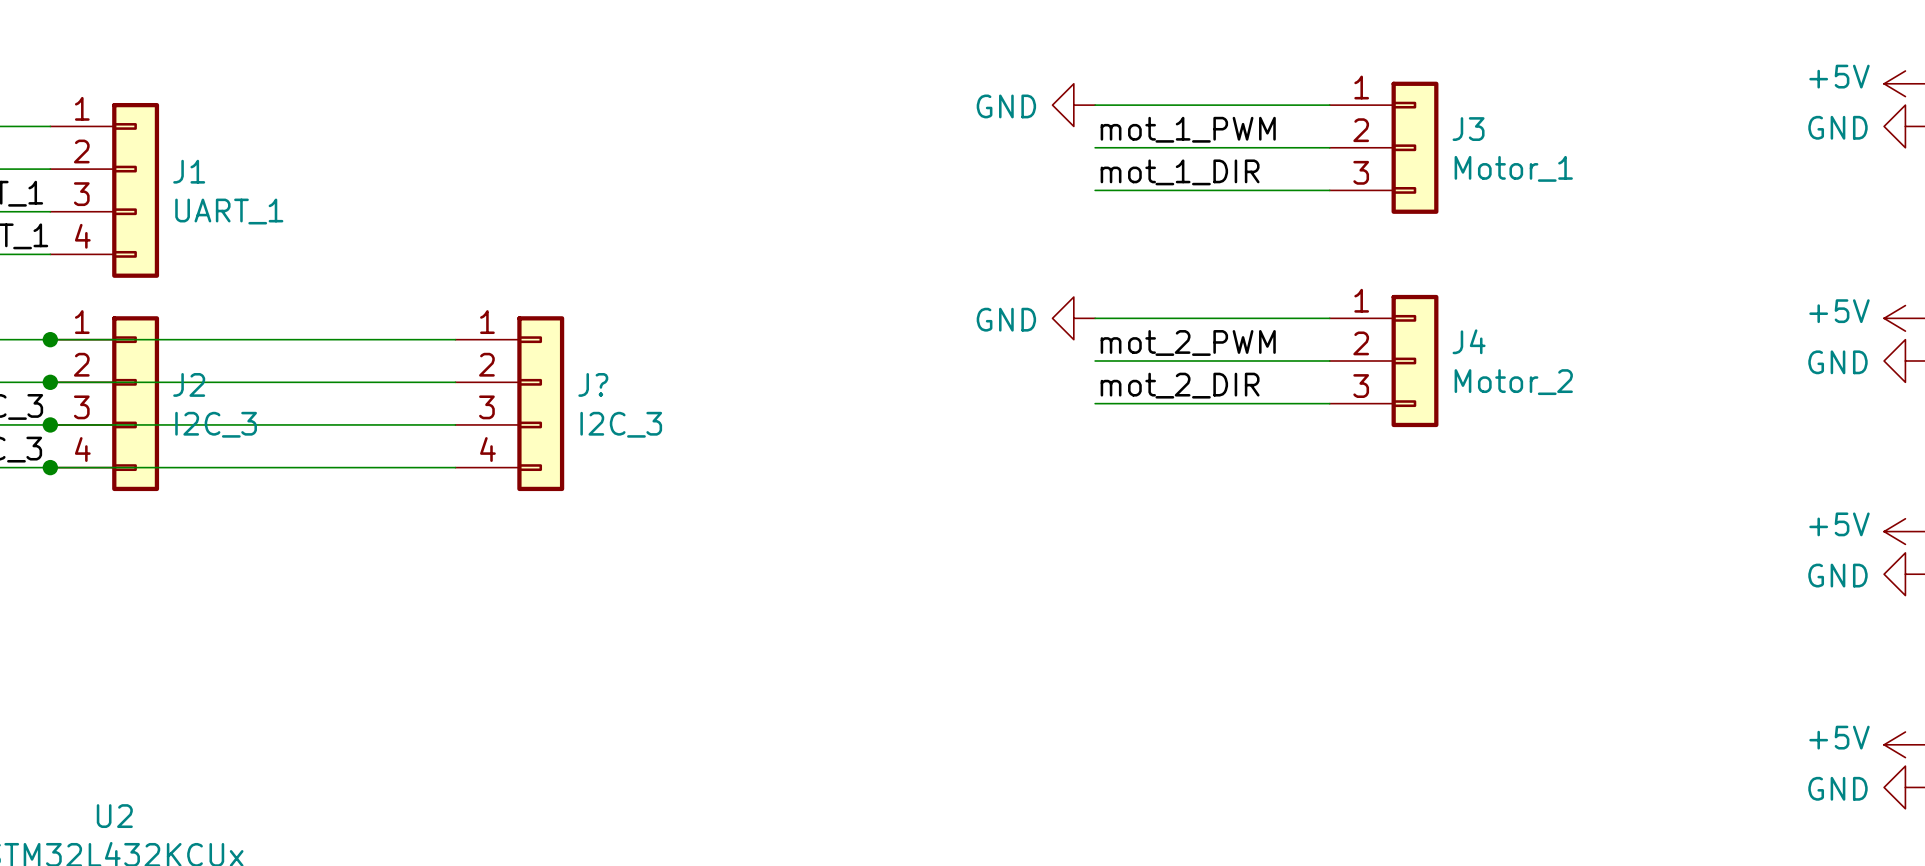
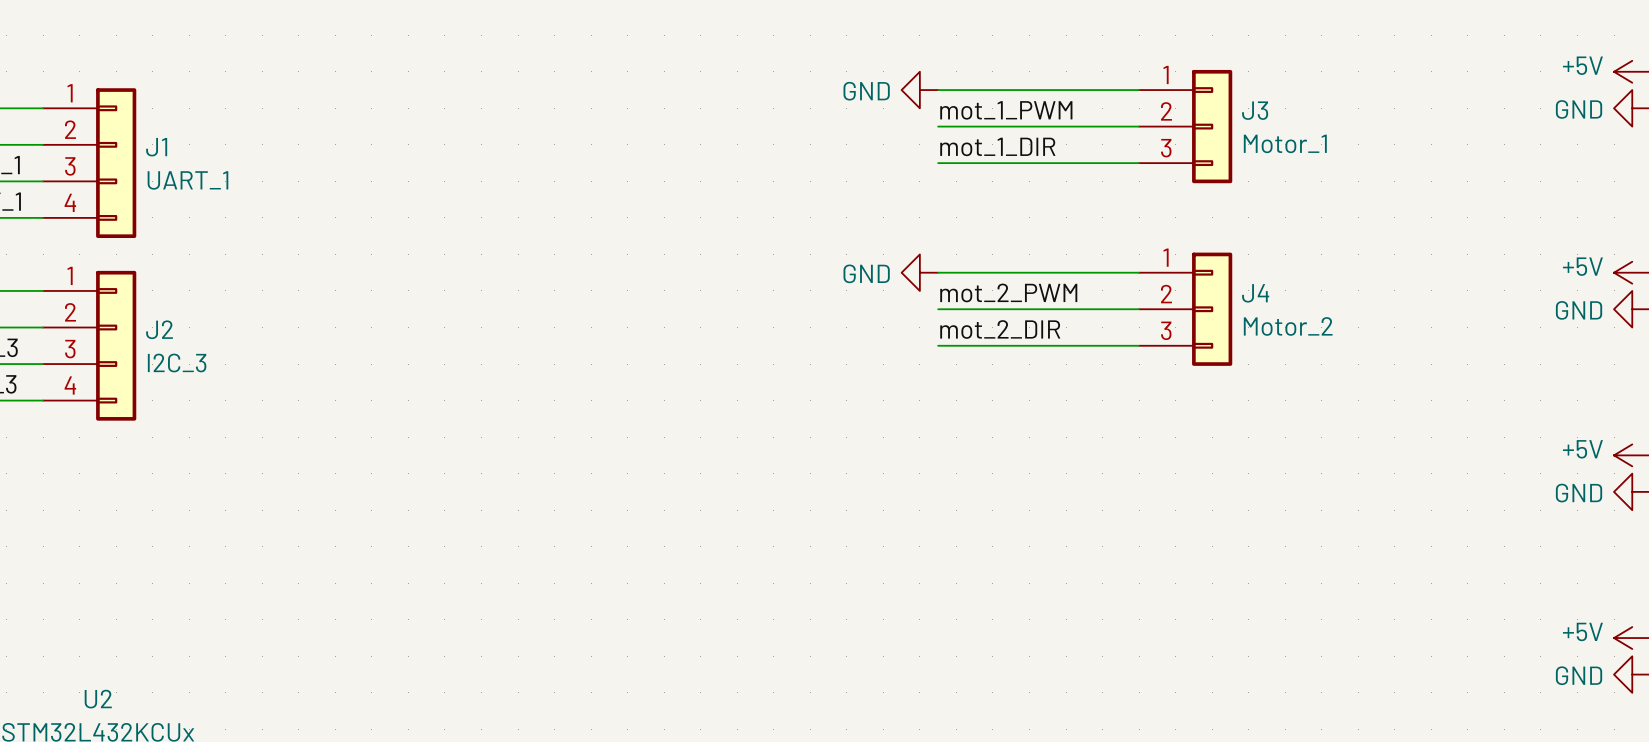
wire: (50, 339) (455, 339) -> none
junction: (50, 339) -> none
wire: (50, 382) (455, 382) -> none
junction: (50, 382) -> none
J?: I2C_3 (509, 403) -> none
wire: (50, 424) (455, 424) -> none
junction: (50, 424) -> none
wire: (50, 467) (455, 467) -> none
junction: (50, 467) -> none

